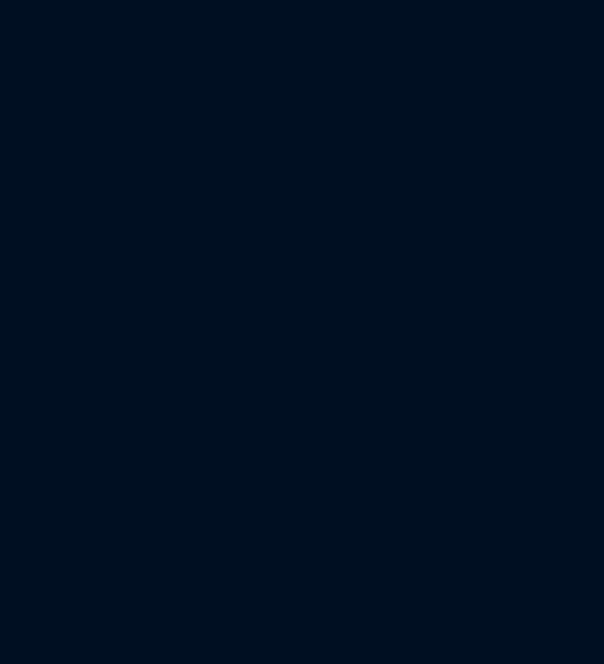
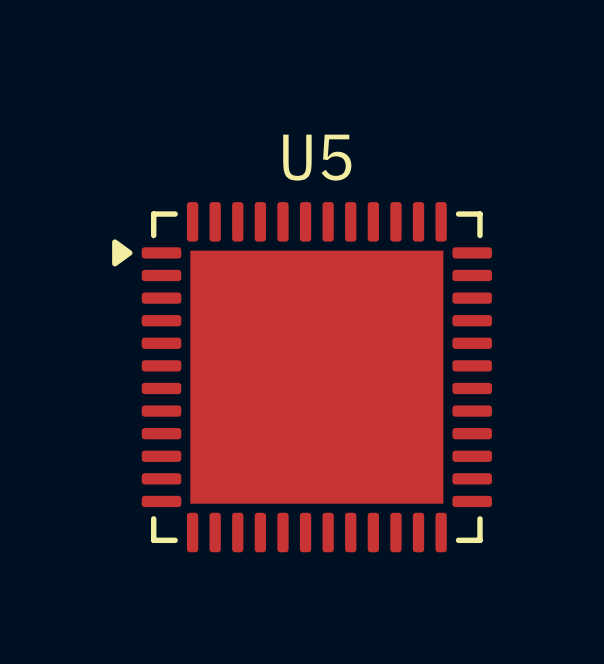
U5: none -> (302, 377)

